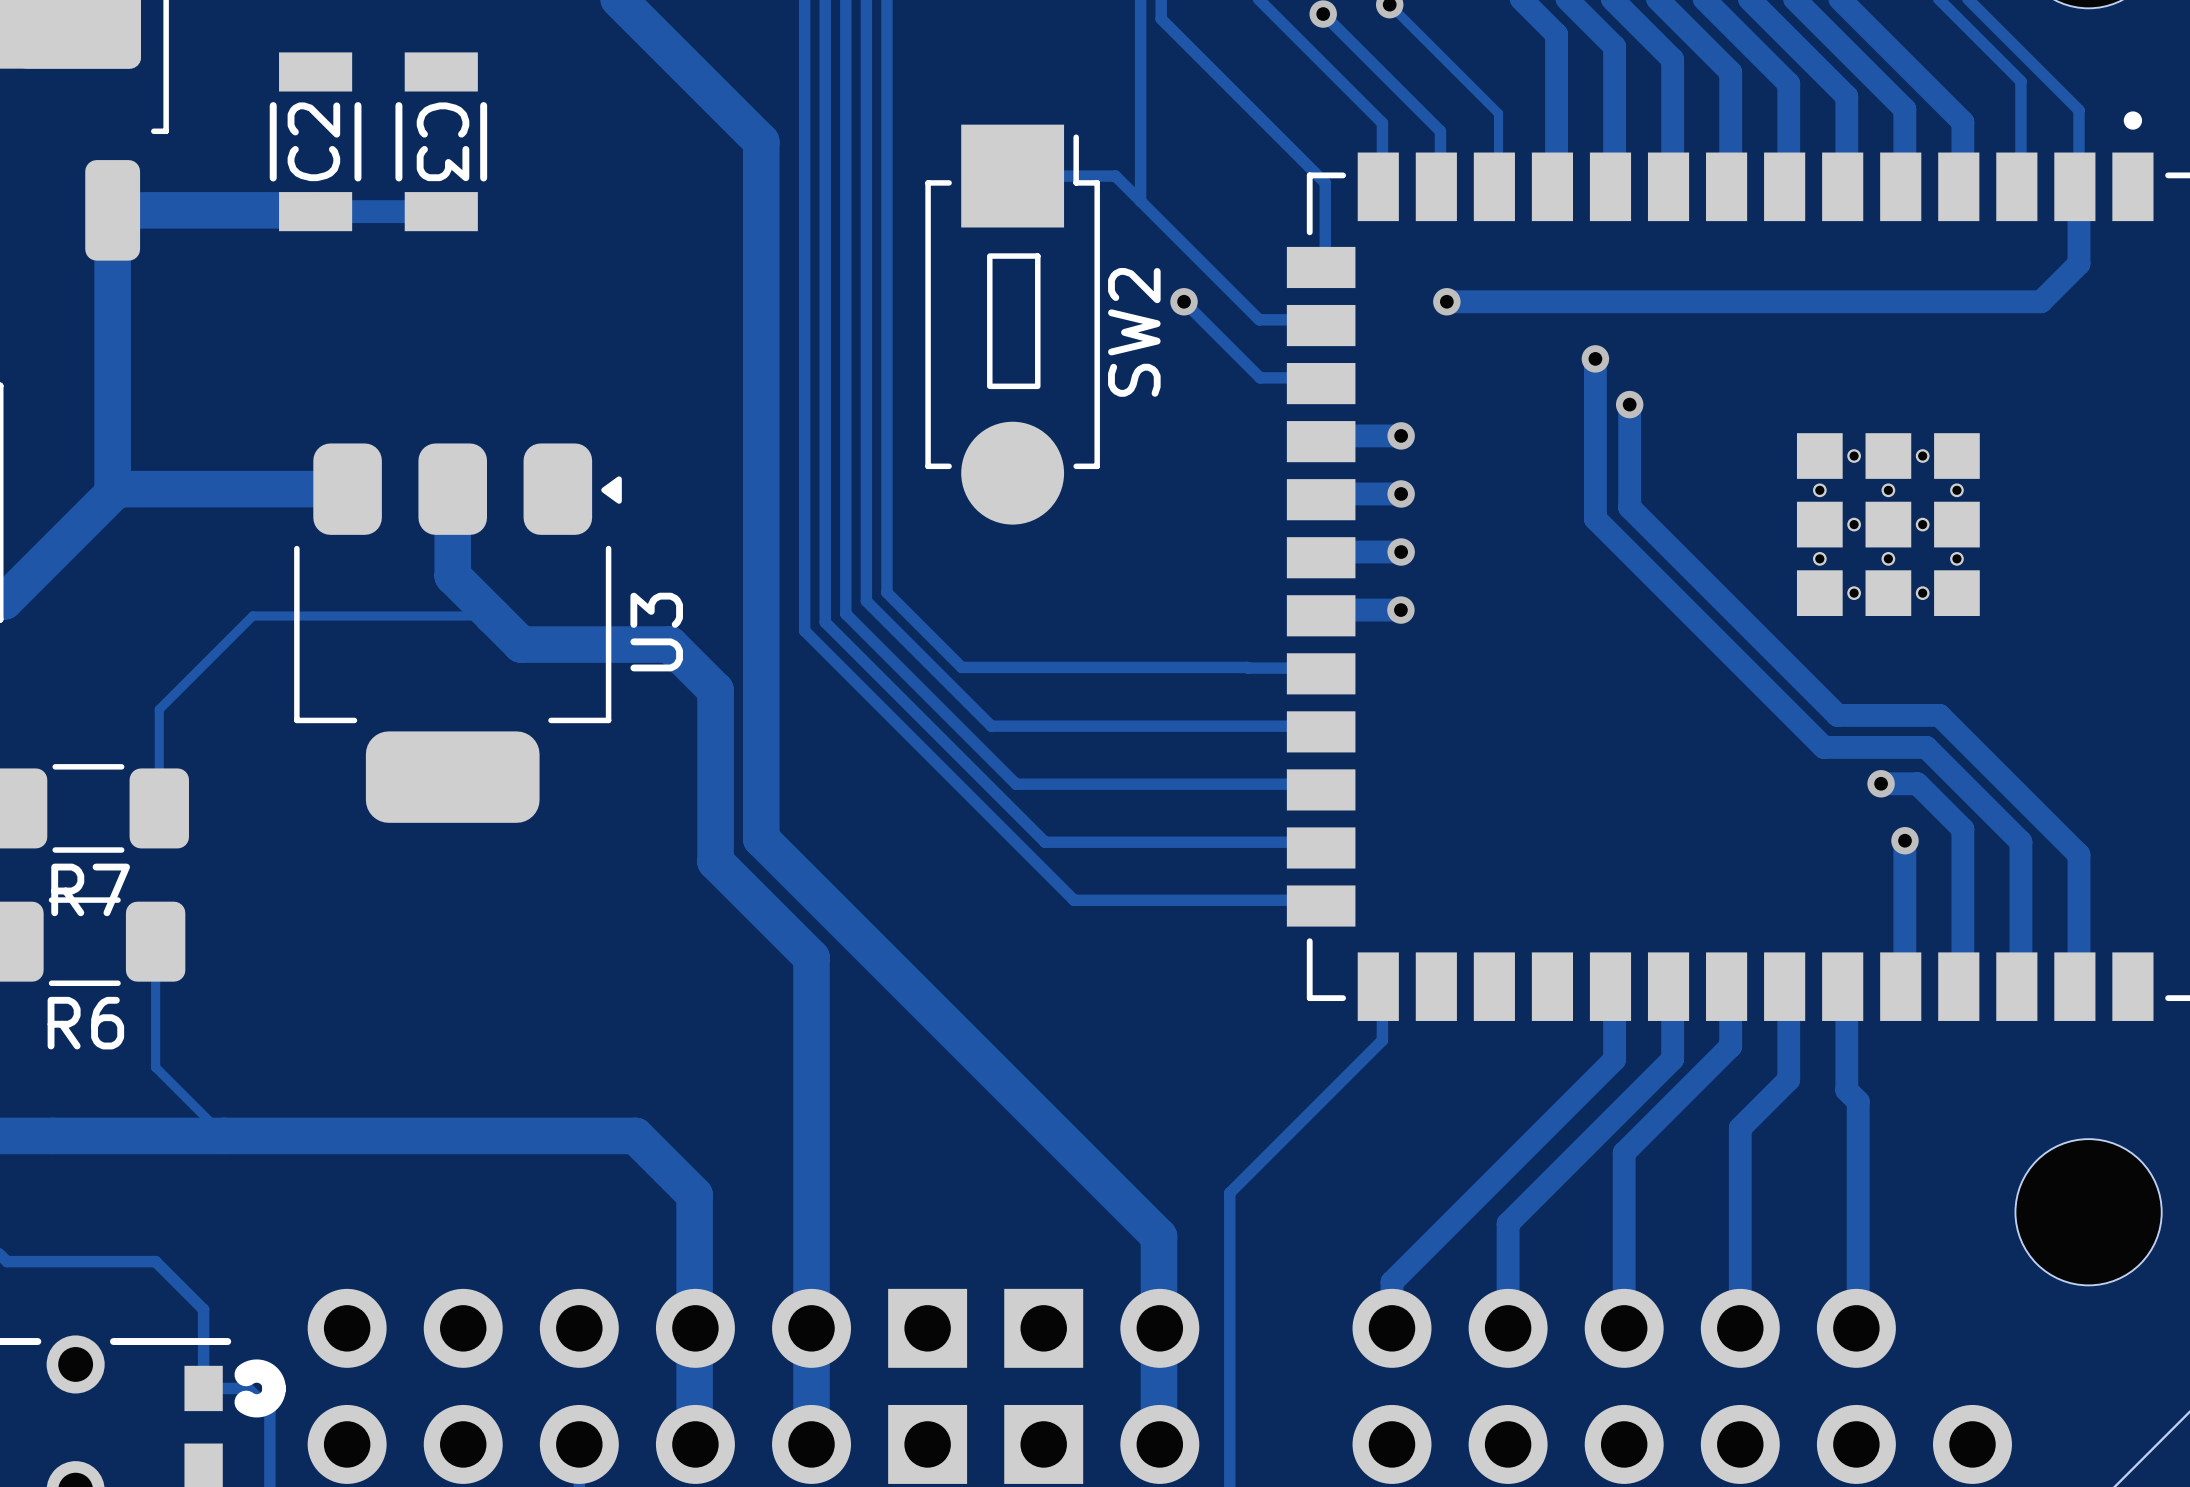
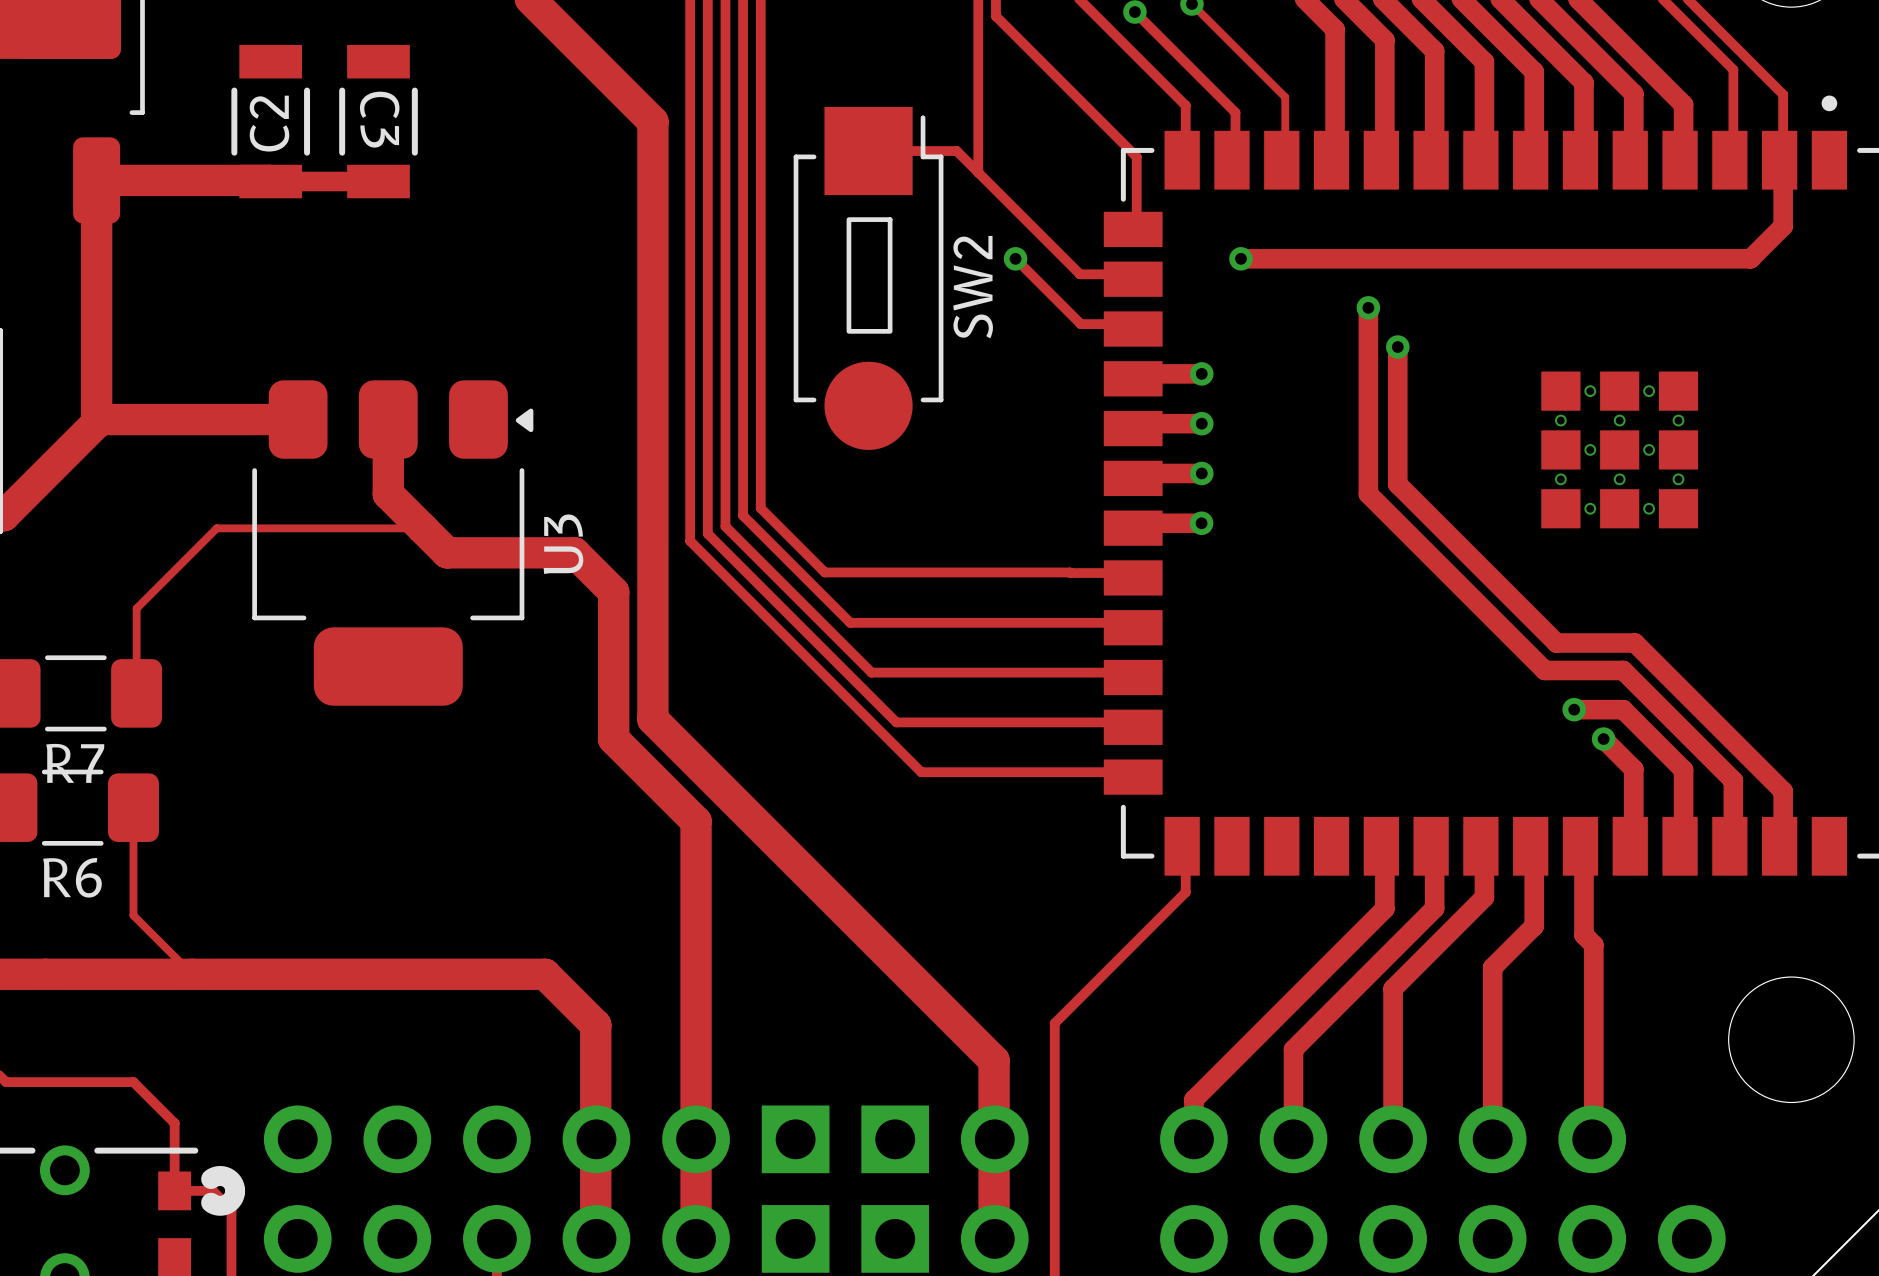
track: (1629, 507) (1837, 715) (1939, 715) (2078, 854) (2078, 922) -> (1397, 435) (1397, 484) (1556, 643) (1634, 643) (1783, 791)
track: (1595, 518) (1823, 747) (1926, 747) (2020, 842) (2020, 910) -> (1368, 445) (1368, 494) (1544, 670) (1623, 670) (1733, 780)
track: (1881, 783) (1917, 783) (1962, 829) (1962, 897) -> (1574, 709) (1623, 709) (1683, 770)
via: (1881, 783) -> none
via: none -> (1574, 709)
track: (1904, 840) (1904, 896) -> (1603, 739) (1633, 769)
via: (1905, 840) -> none
via: none -> (1603, 739)

